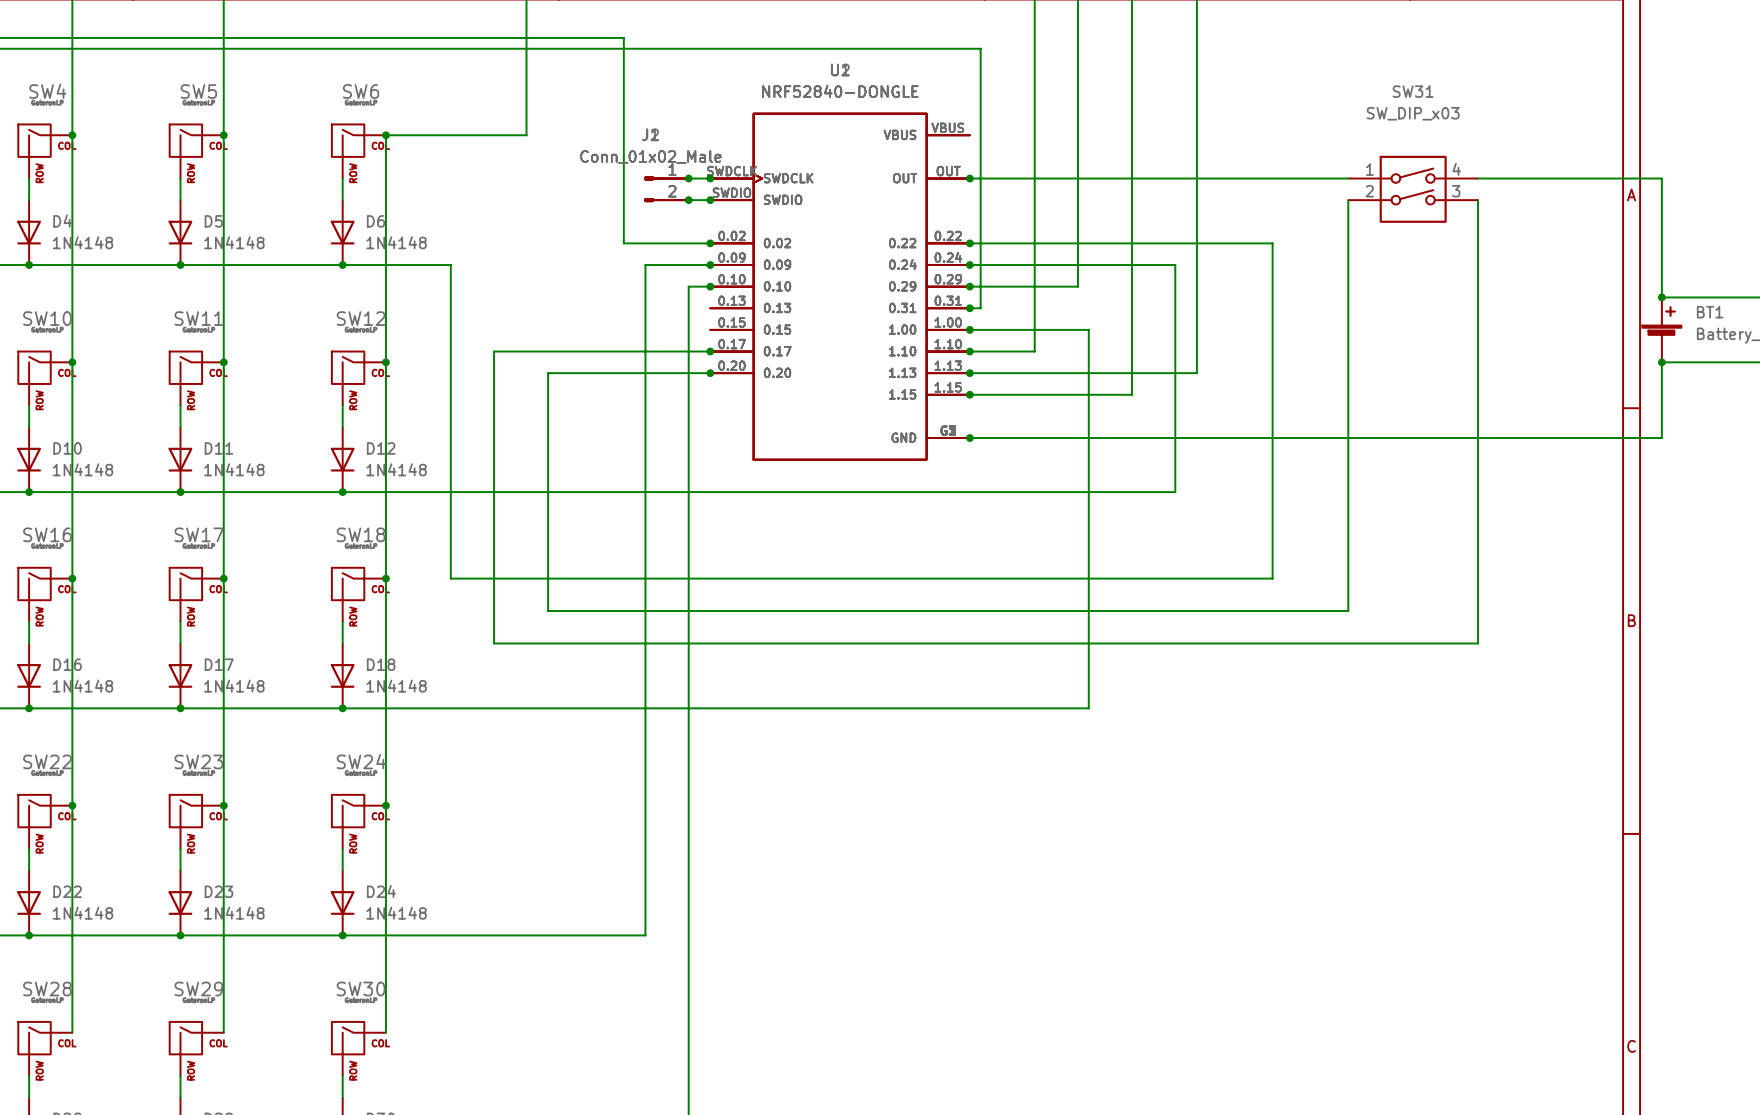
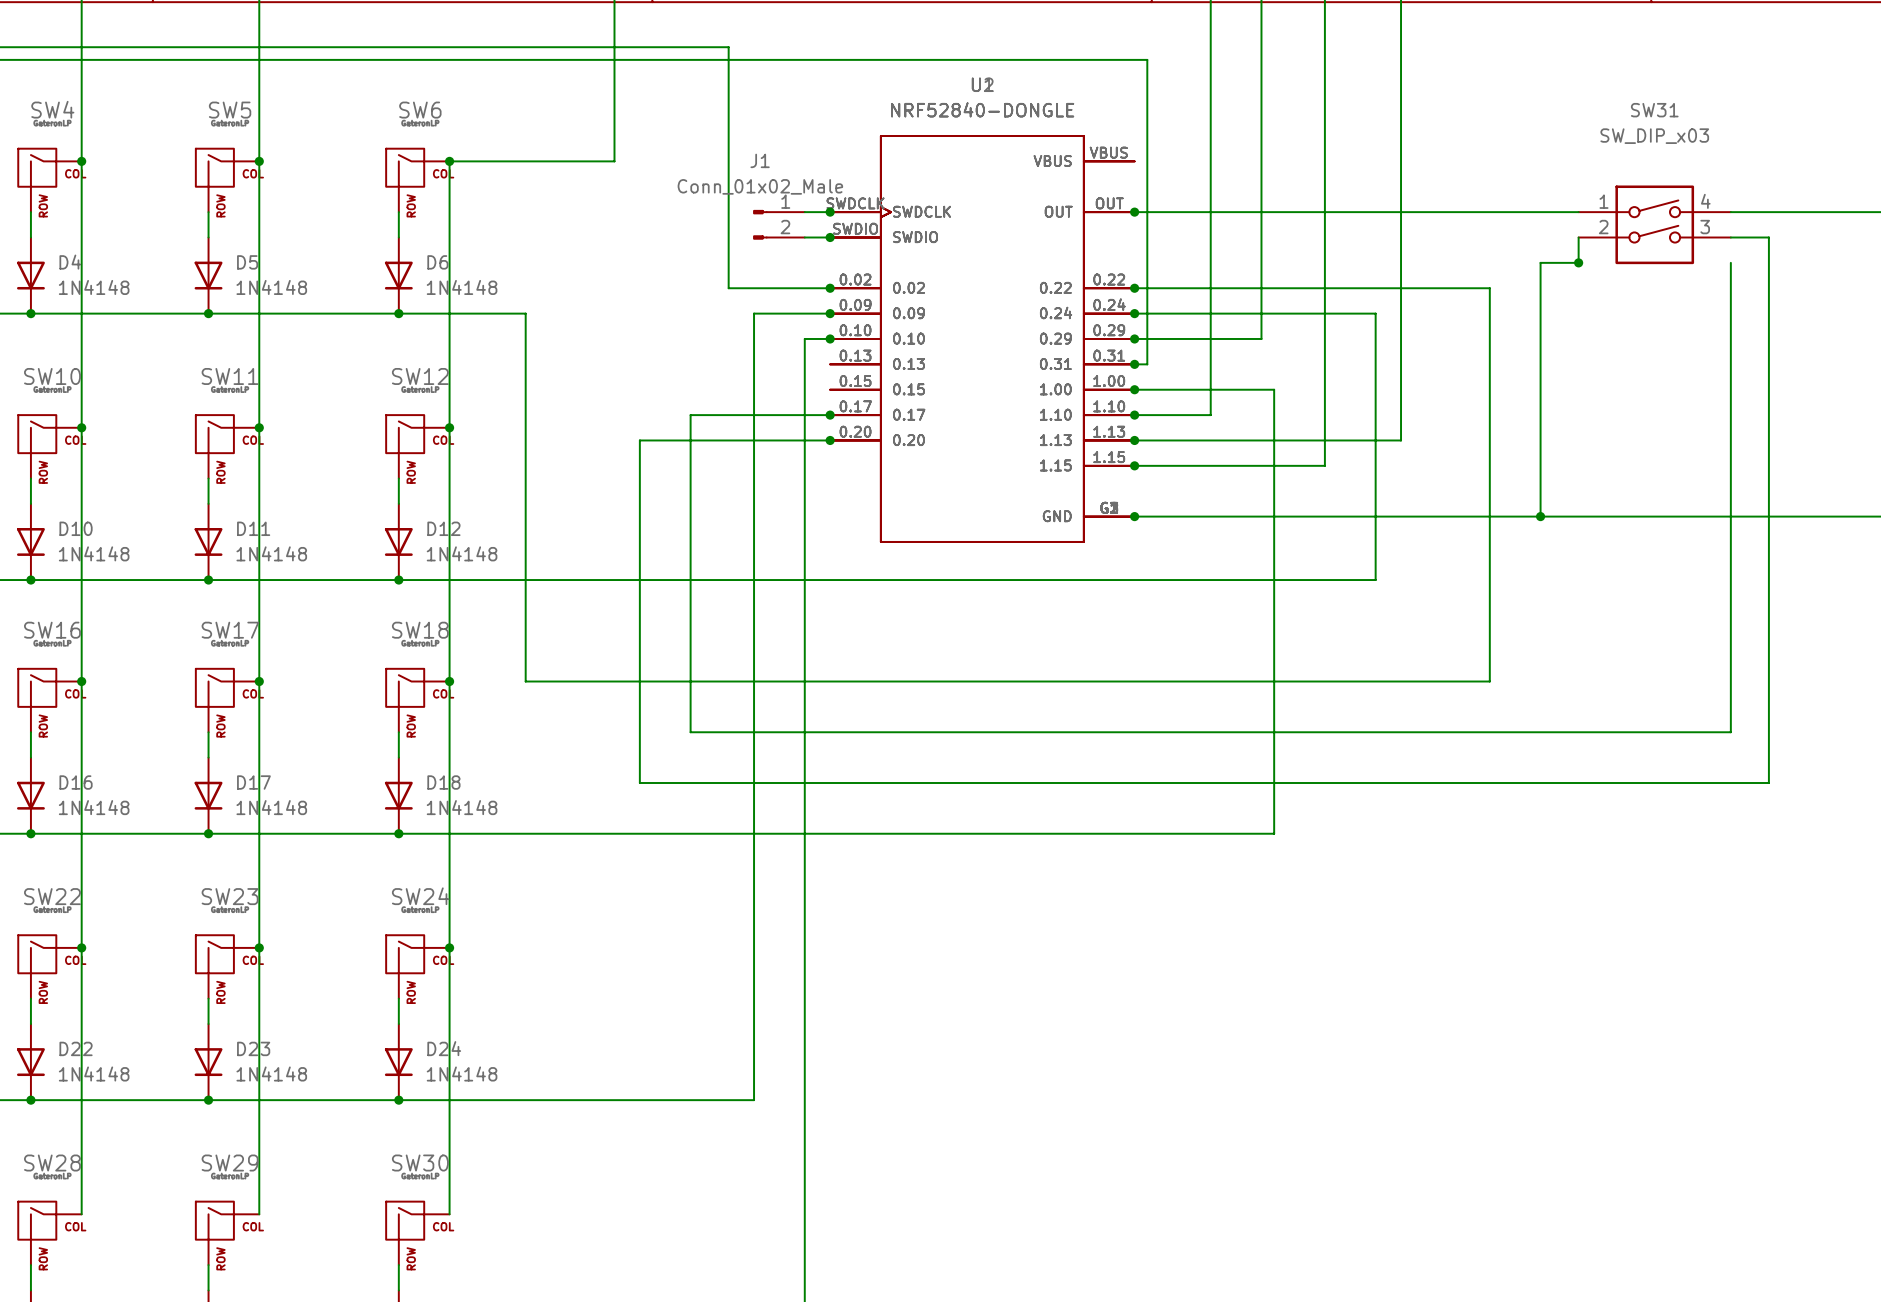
junction: (688, 178) -> none
part: Conn_01x02_Male (666, 189) -> none
junction: (688, 200) -> none
wire: (1478, 200) (1478, 221) -> none
wire: (1348, 221) (1348, 611) (548, 611) -> (1730, 237) (1768, 237) (1768, 782) (639, 782) (639, 719)
wire: none -> (1578, 262) (1540, 262) (1540, 516)
junction: none -> (1578, 262)
wire: (591, 351) (494, 351) (494, 643) (1478, 643) (1478, 621) -> (690, 415) (690, 732) (1730, 732)
junction: none -> (1540, 516)

